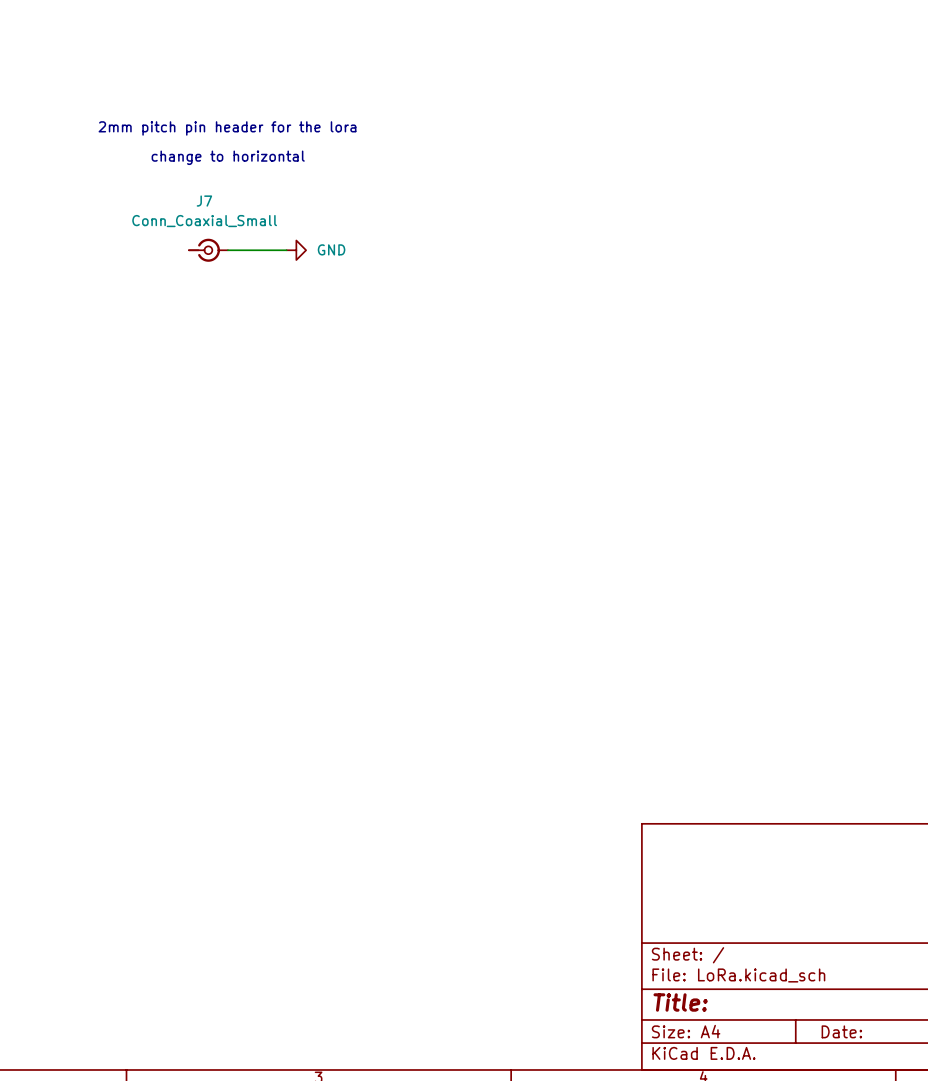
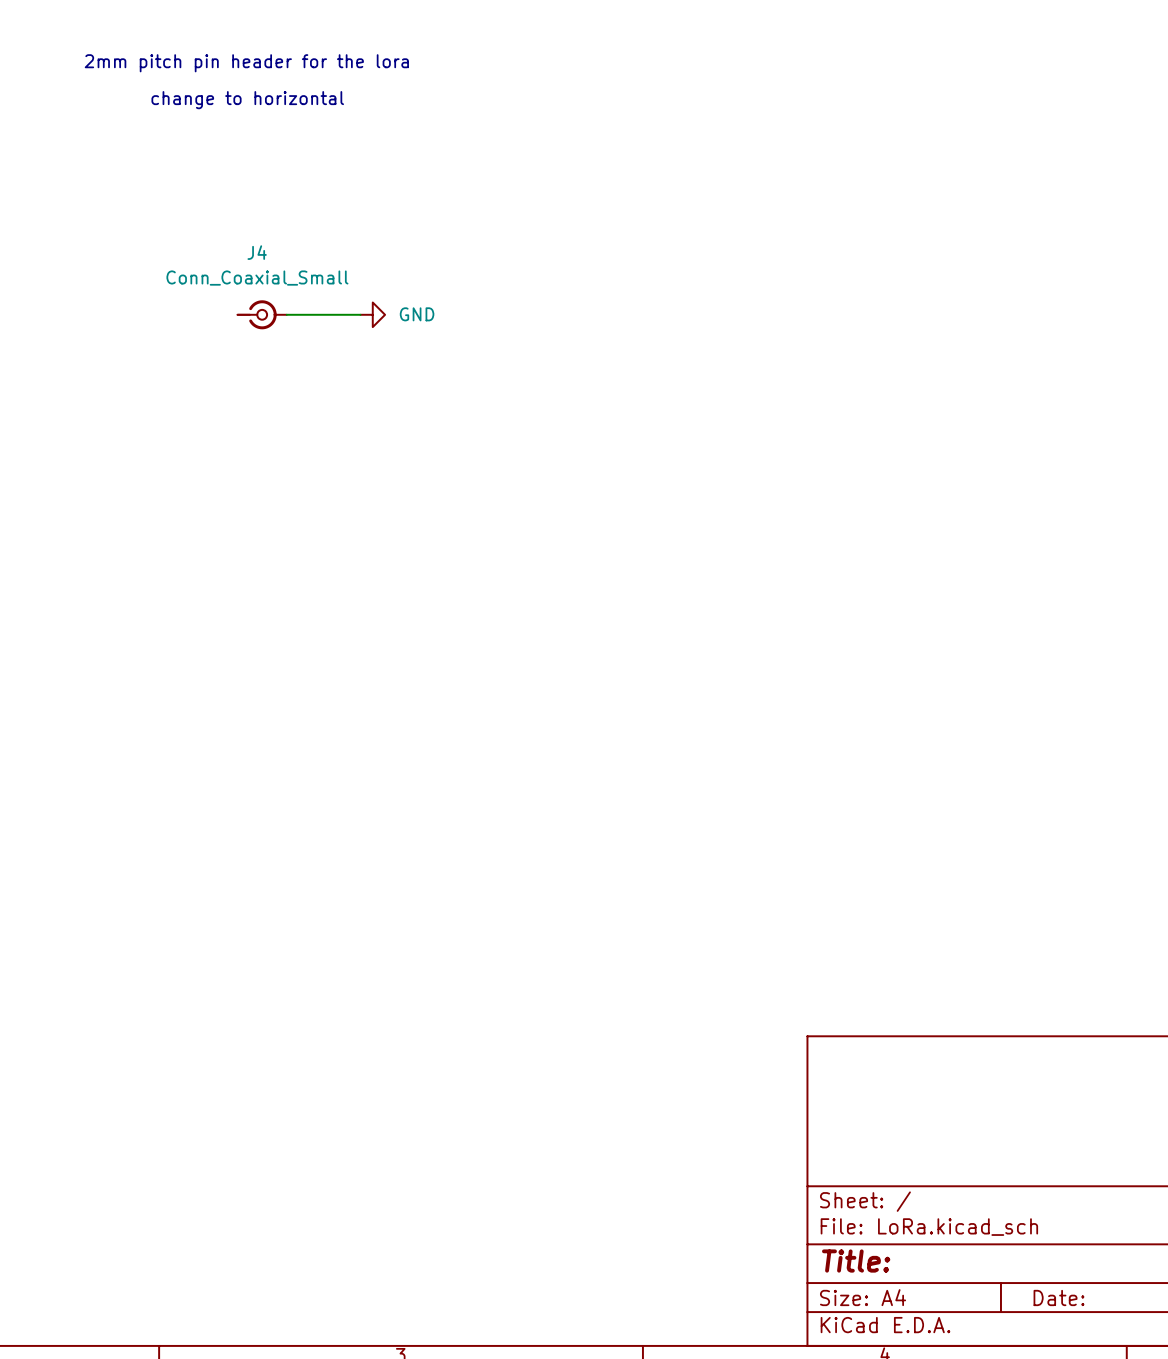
text position: 2mm pitch pin header for the lora (227, 128) -> 2mm pitch pin header for the lora (246, 63)
text position: change to horizontal (228, 157) -> change to horizontal (247, 100)
J7 name: J7 (204, 201) -> J4 (257, 252)

